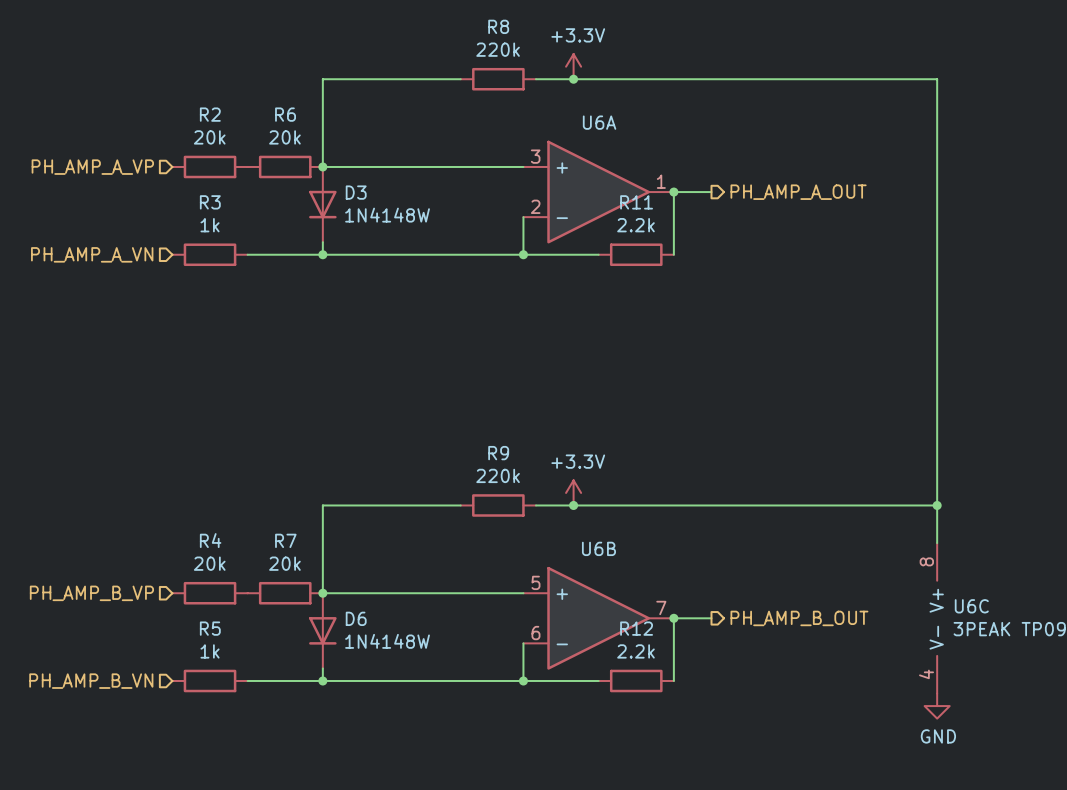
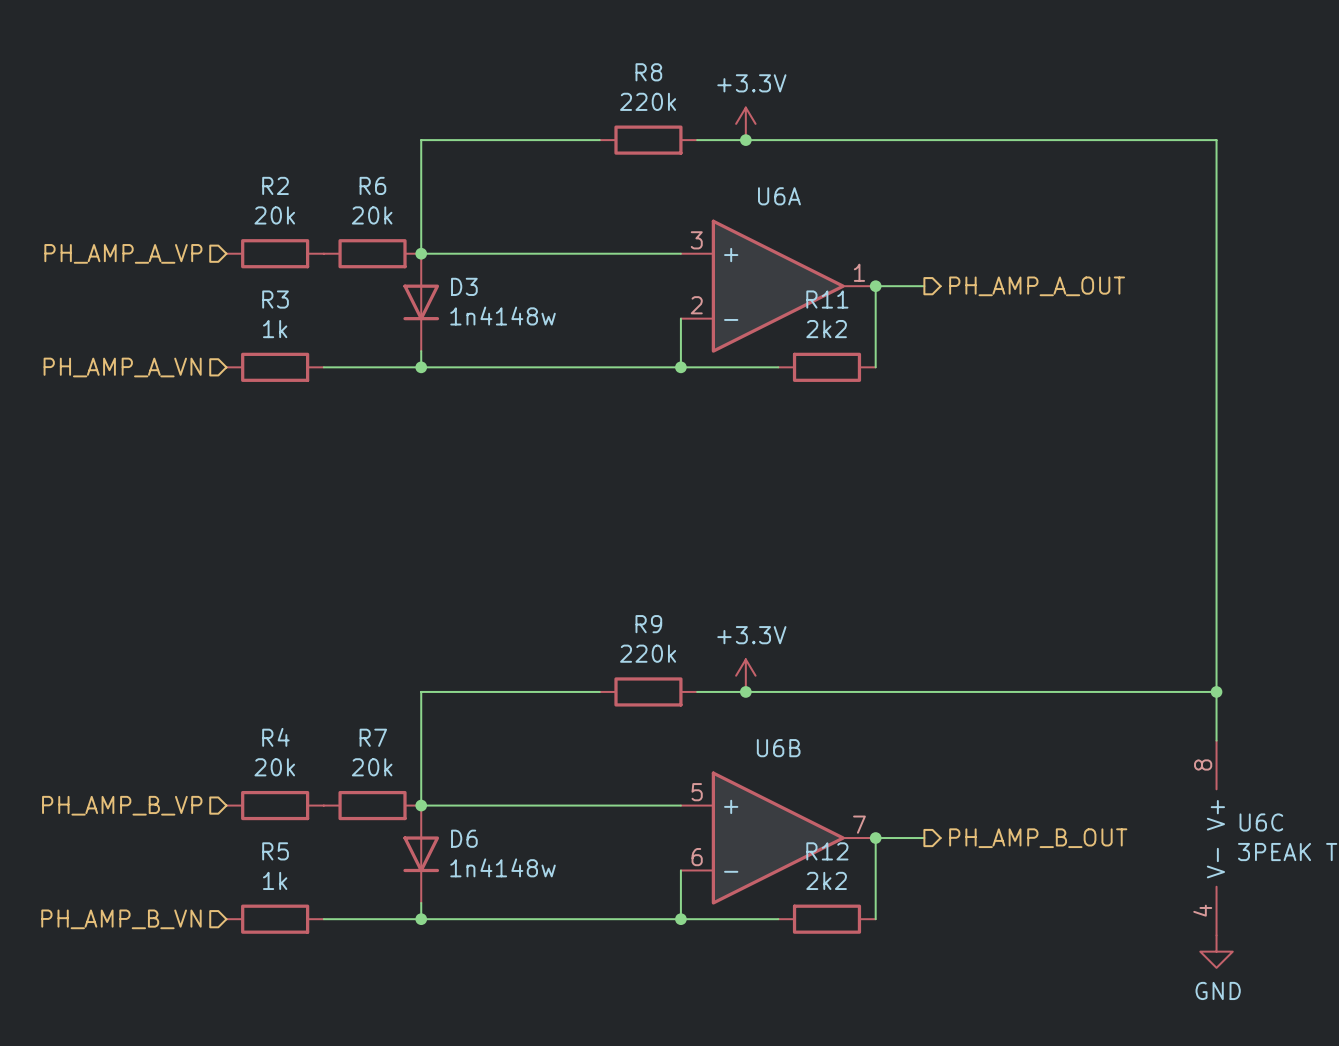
D3 value: 1N4148W (387, 215) -> 1n4148w (503, 316)
R11 value: 2.2k (635, 225) -> 2k2 (826, 329)
D6 value: 1N4148W (387, 641) -> 1n4148w (503, 867)
R12 value: 2.2k (635, 651) -> 2k2 (826, 880)

